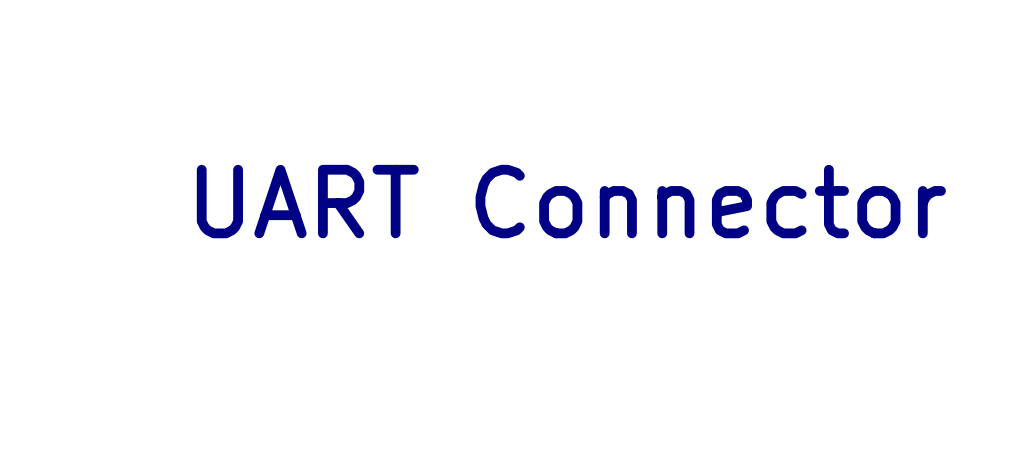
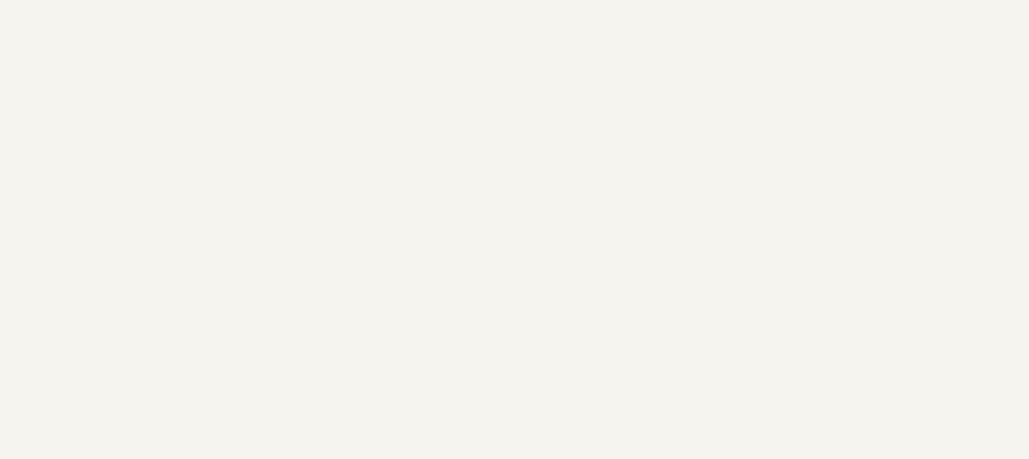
text: UART Connector (571, 201) -> none

